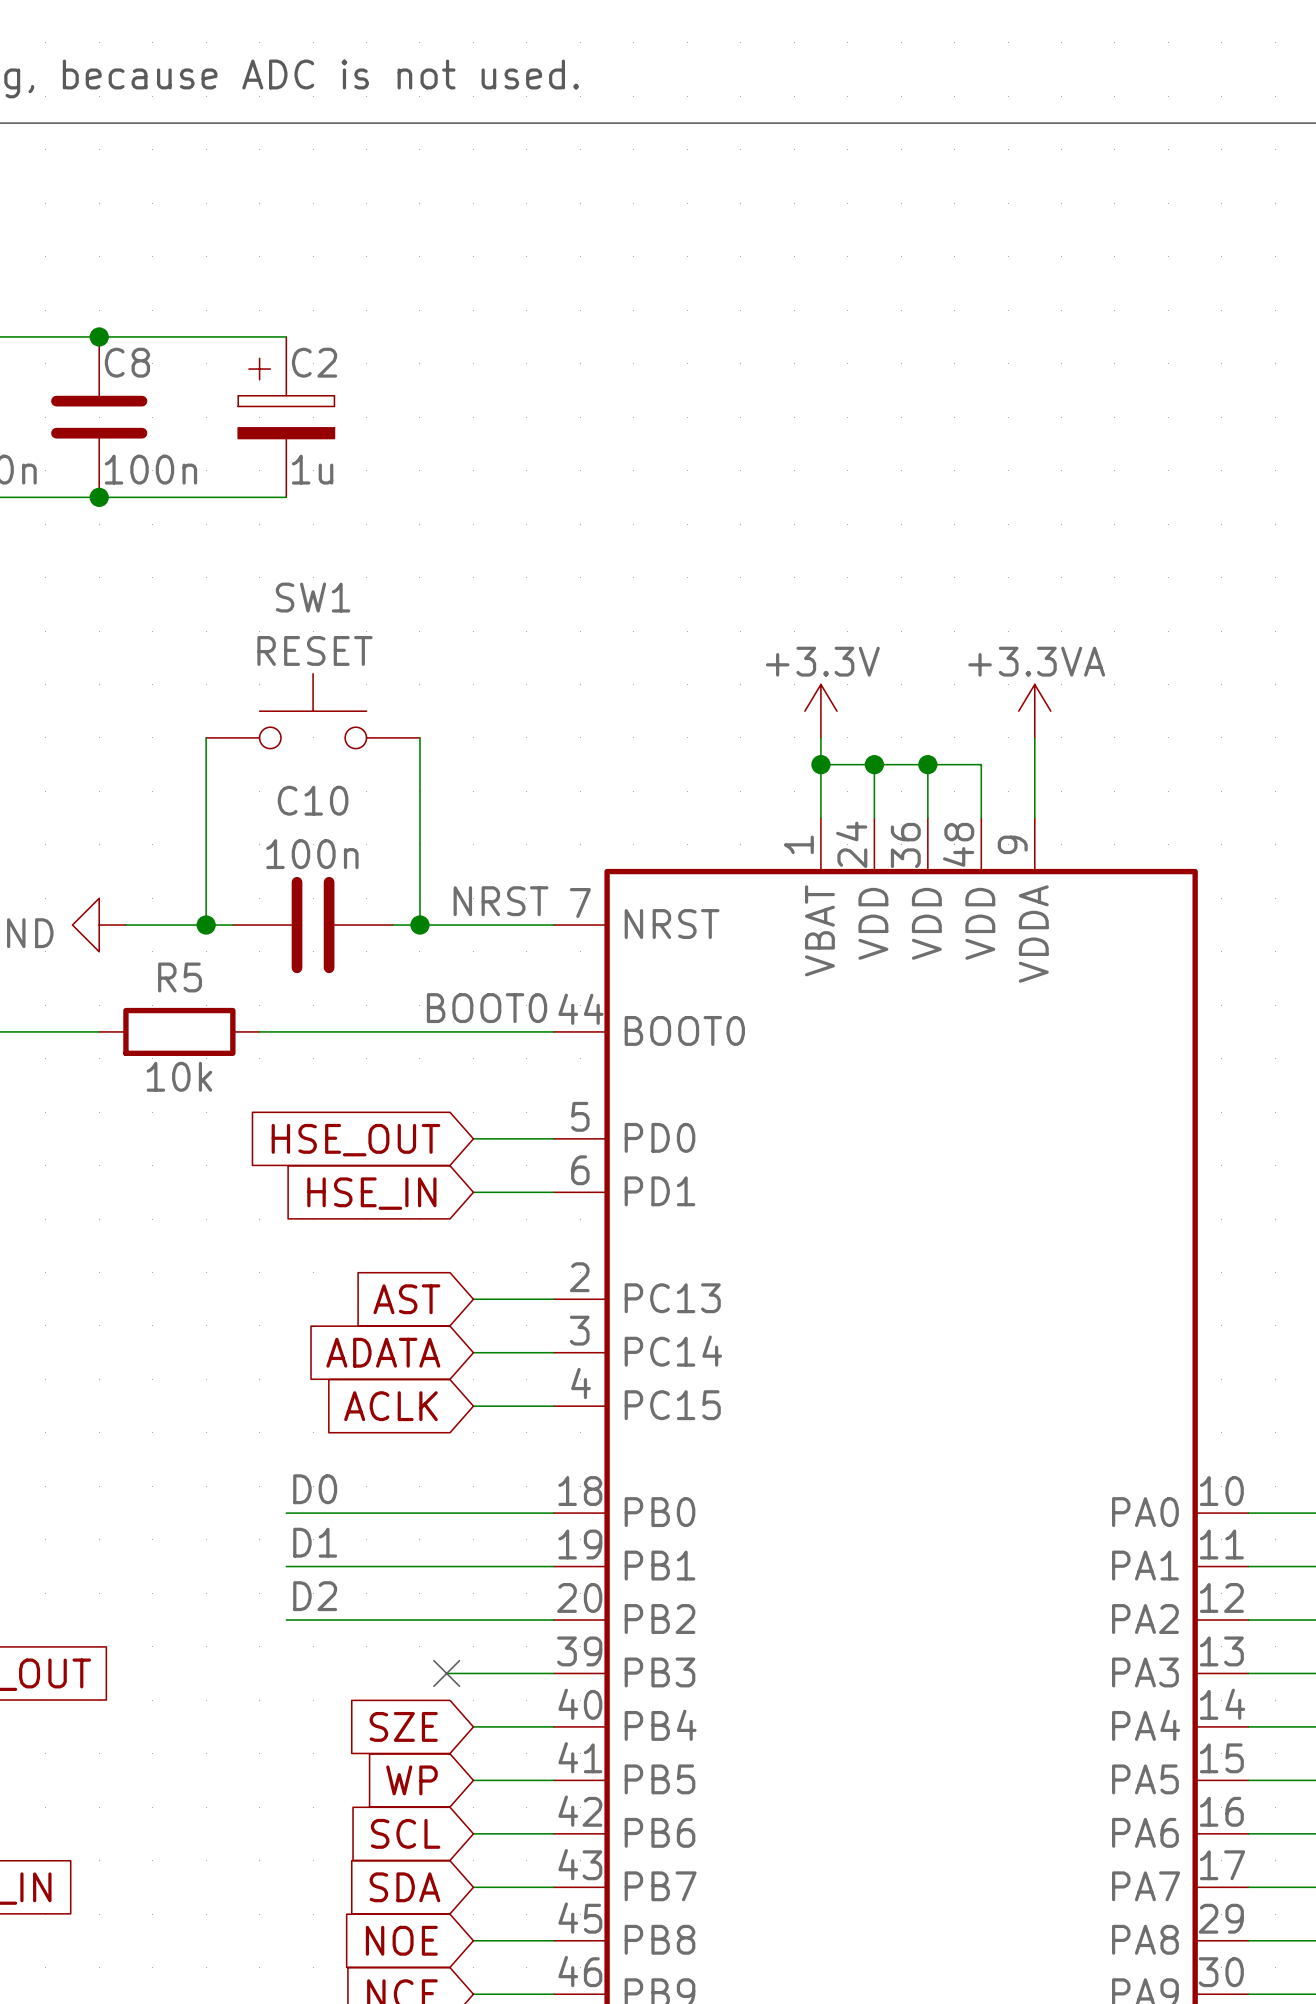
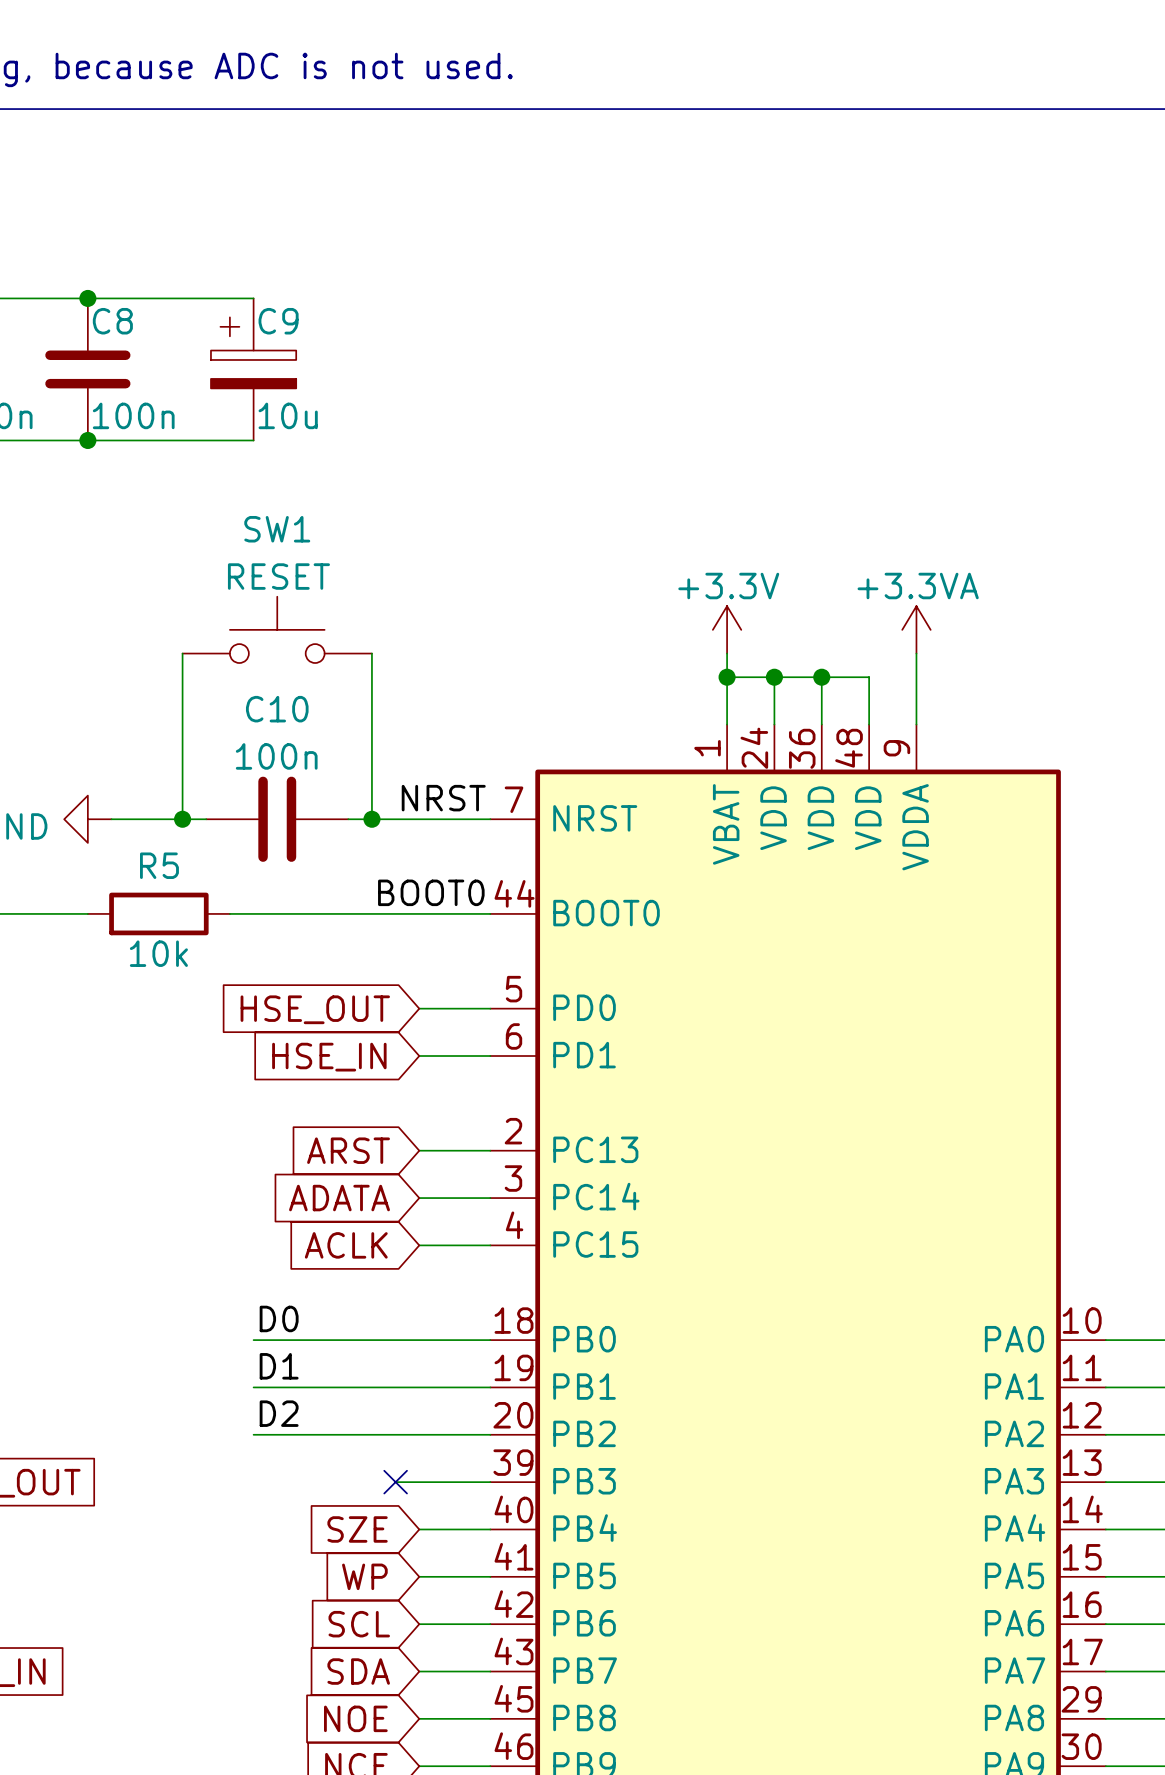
C2 name: C2 (314, 362) -> C9 (278, 321)
C2 value: 1u (312, 469) -> 10u (288, 415)
global label: AST (406, 1299) -> ARST (348, 1150)

